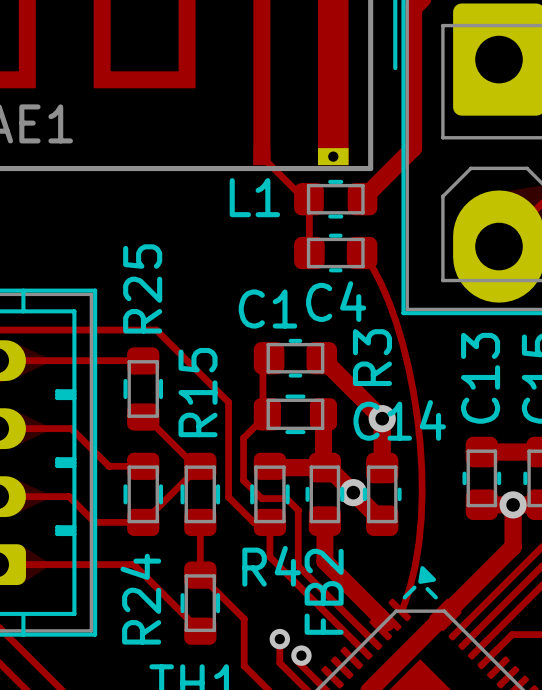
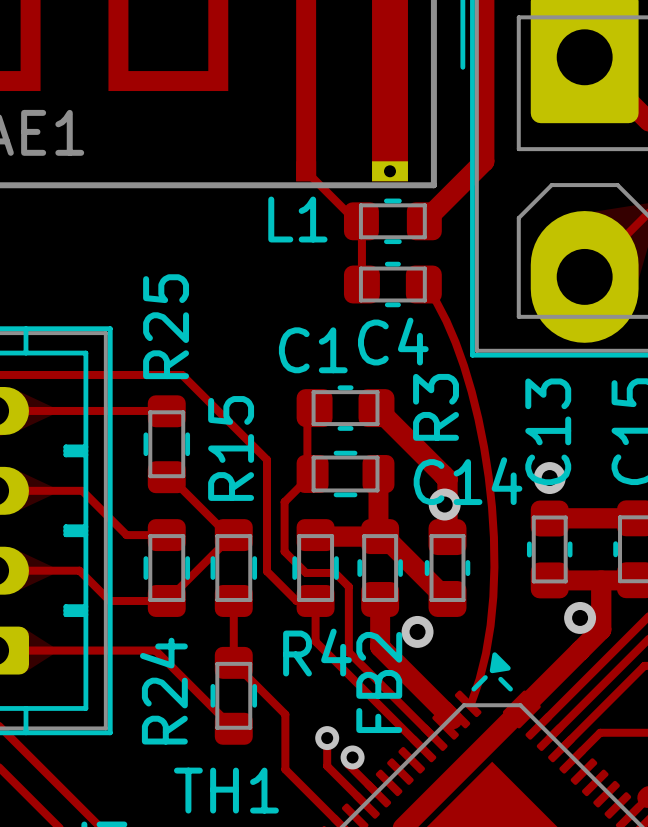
via: none -> (549, 478)
via position: (382, 418) -> (444, 504)
C13 position: (481, 478) -> (549, 549)
via: (353, 492) -> none
via position: (513, 504) -> (580, 617)
via: none -> (417, 631)

